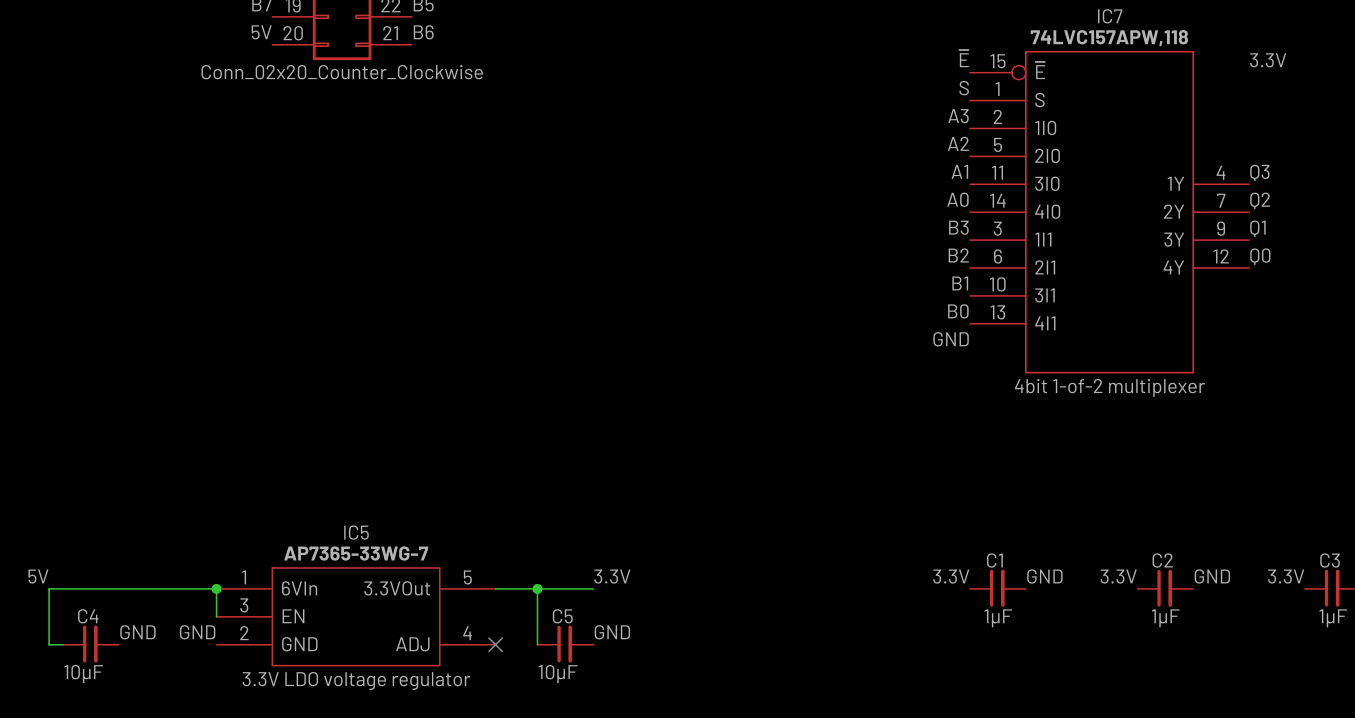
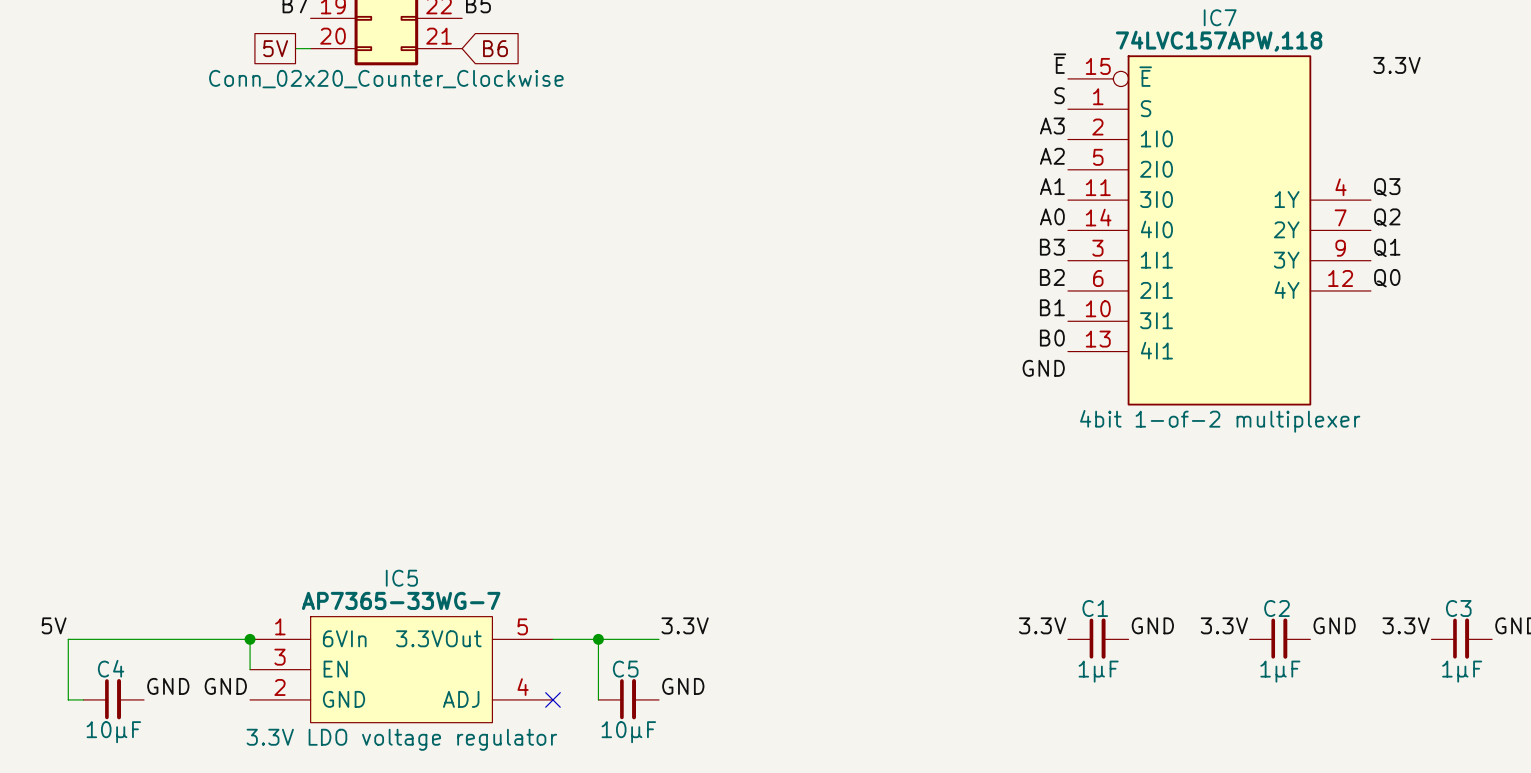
label: 5V (261, 32) -> none
label: B6 (423, 32) -> none
global label: none -> 5V (275, 48)
wire: none -> (295, 48) (310, 48)
global label: none -> B6 (495, 48)

